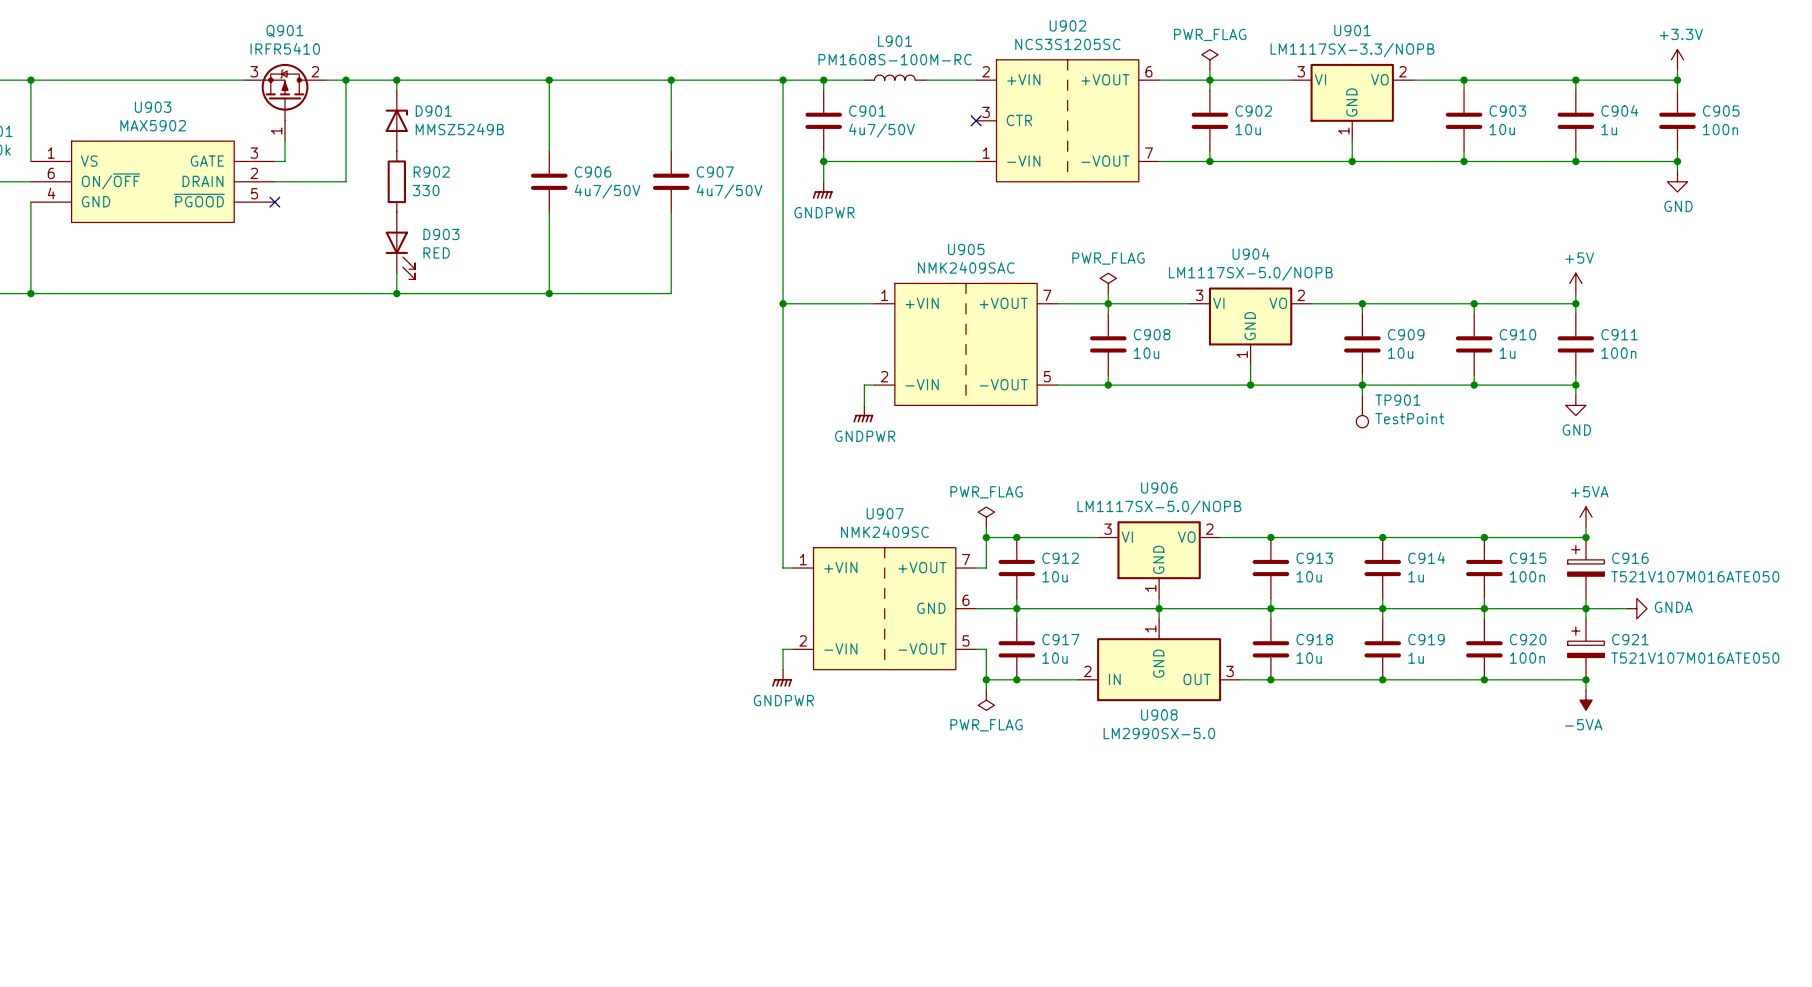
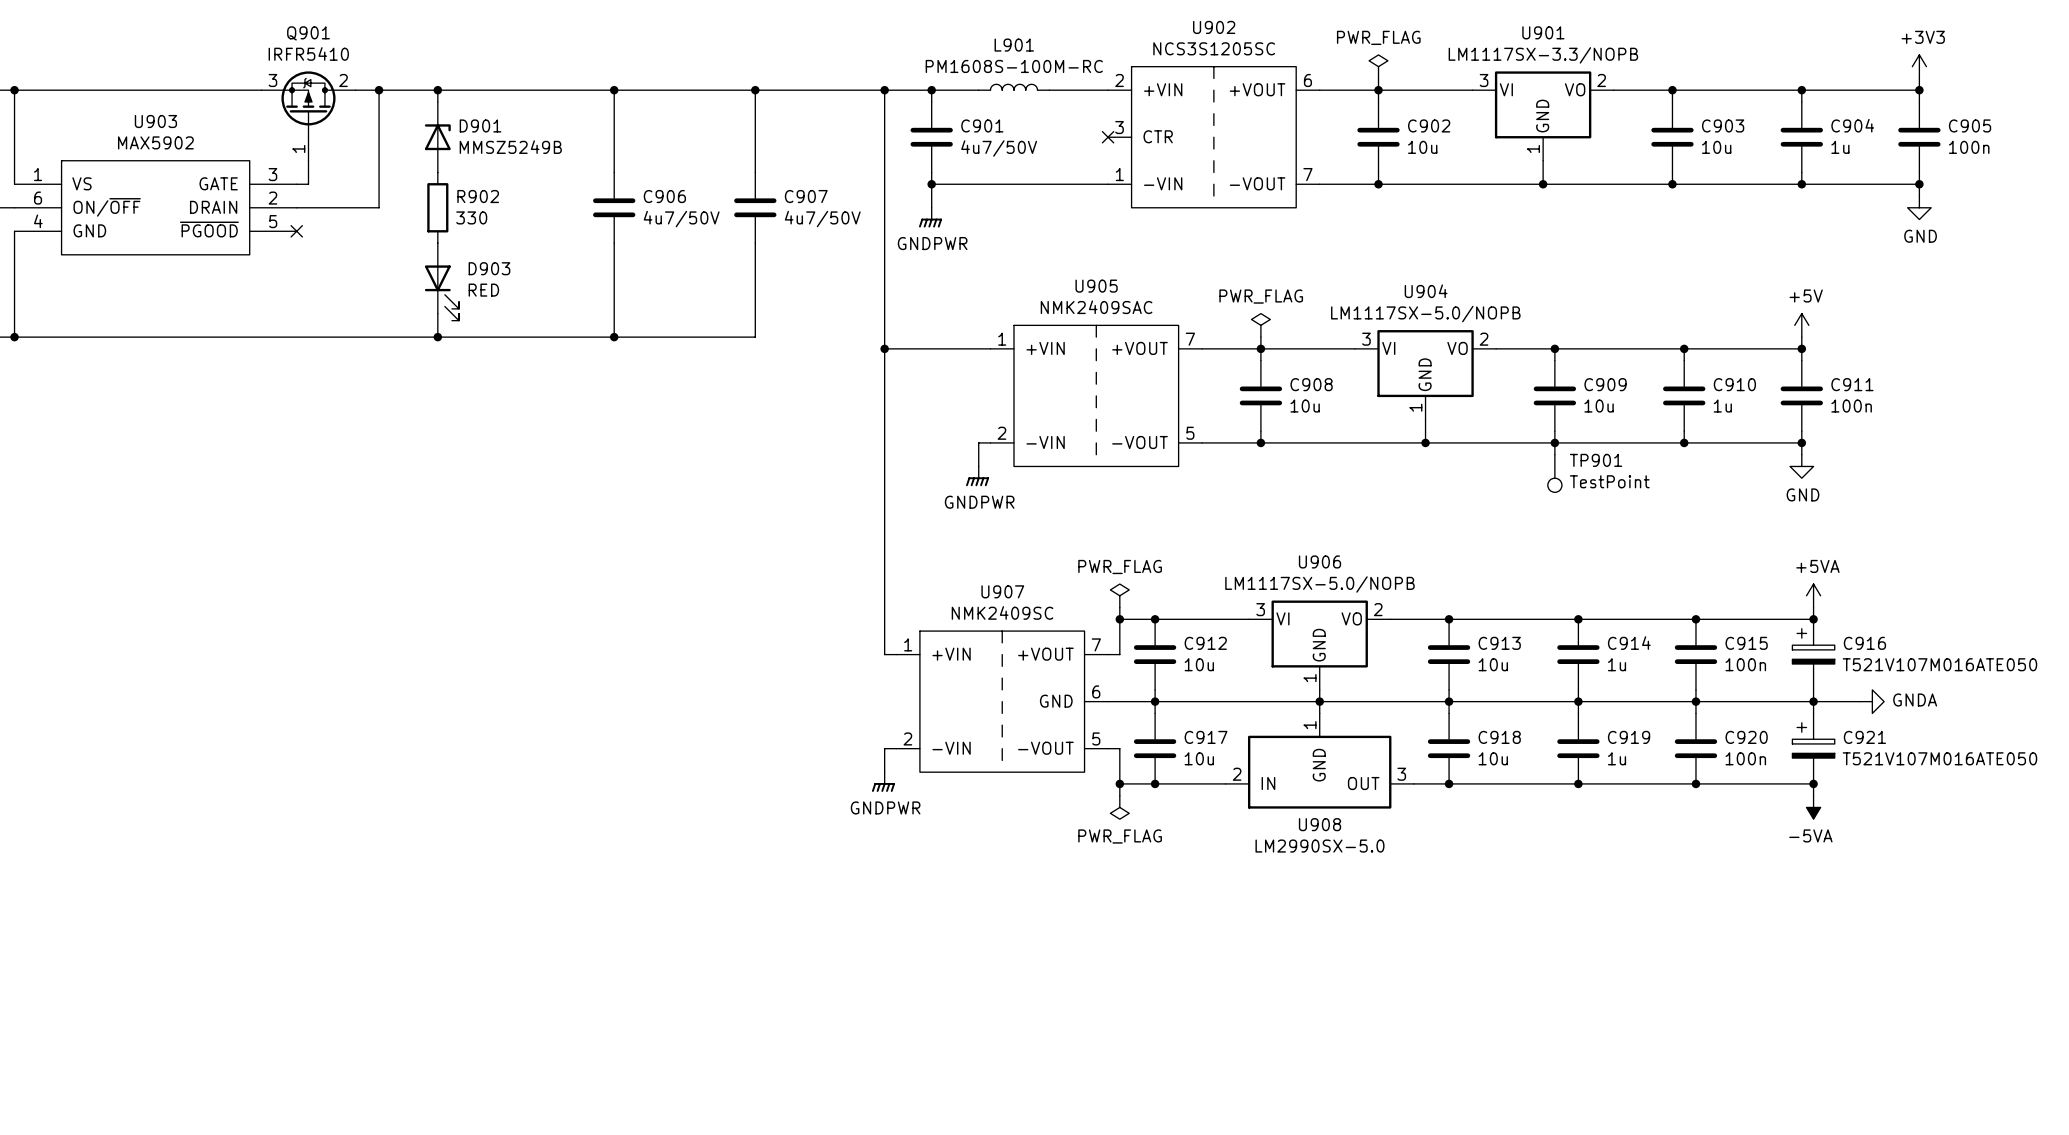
power symbol: +3.3V (1677, 59) -> +3V3 (1919, 66)

